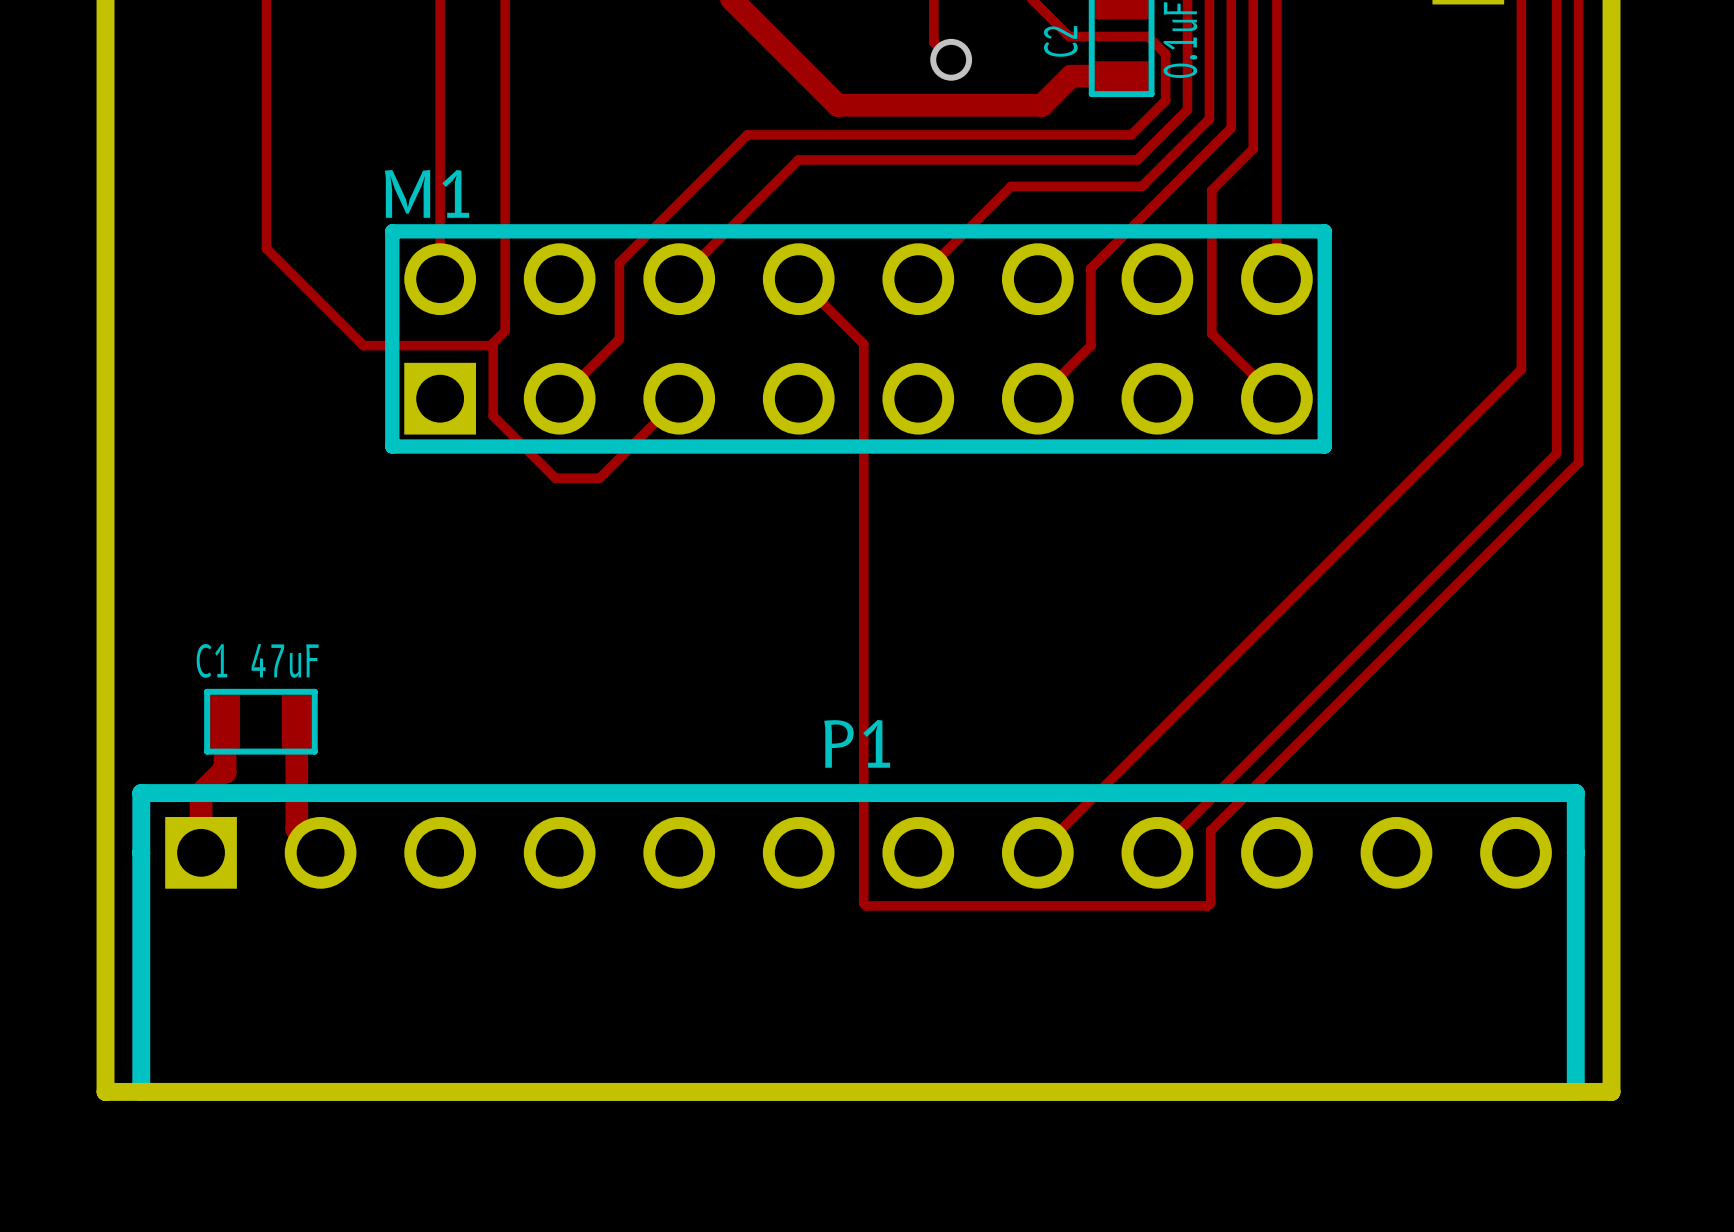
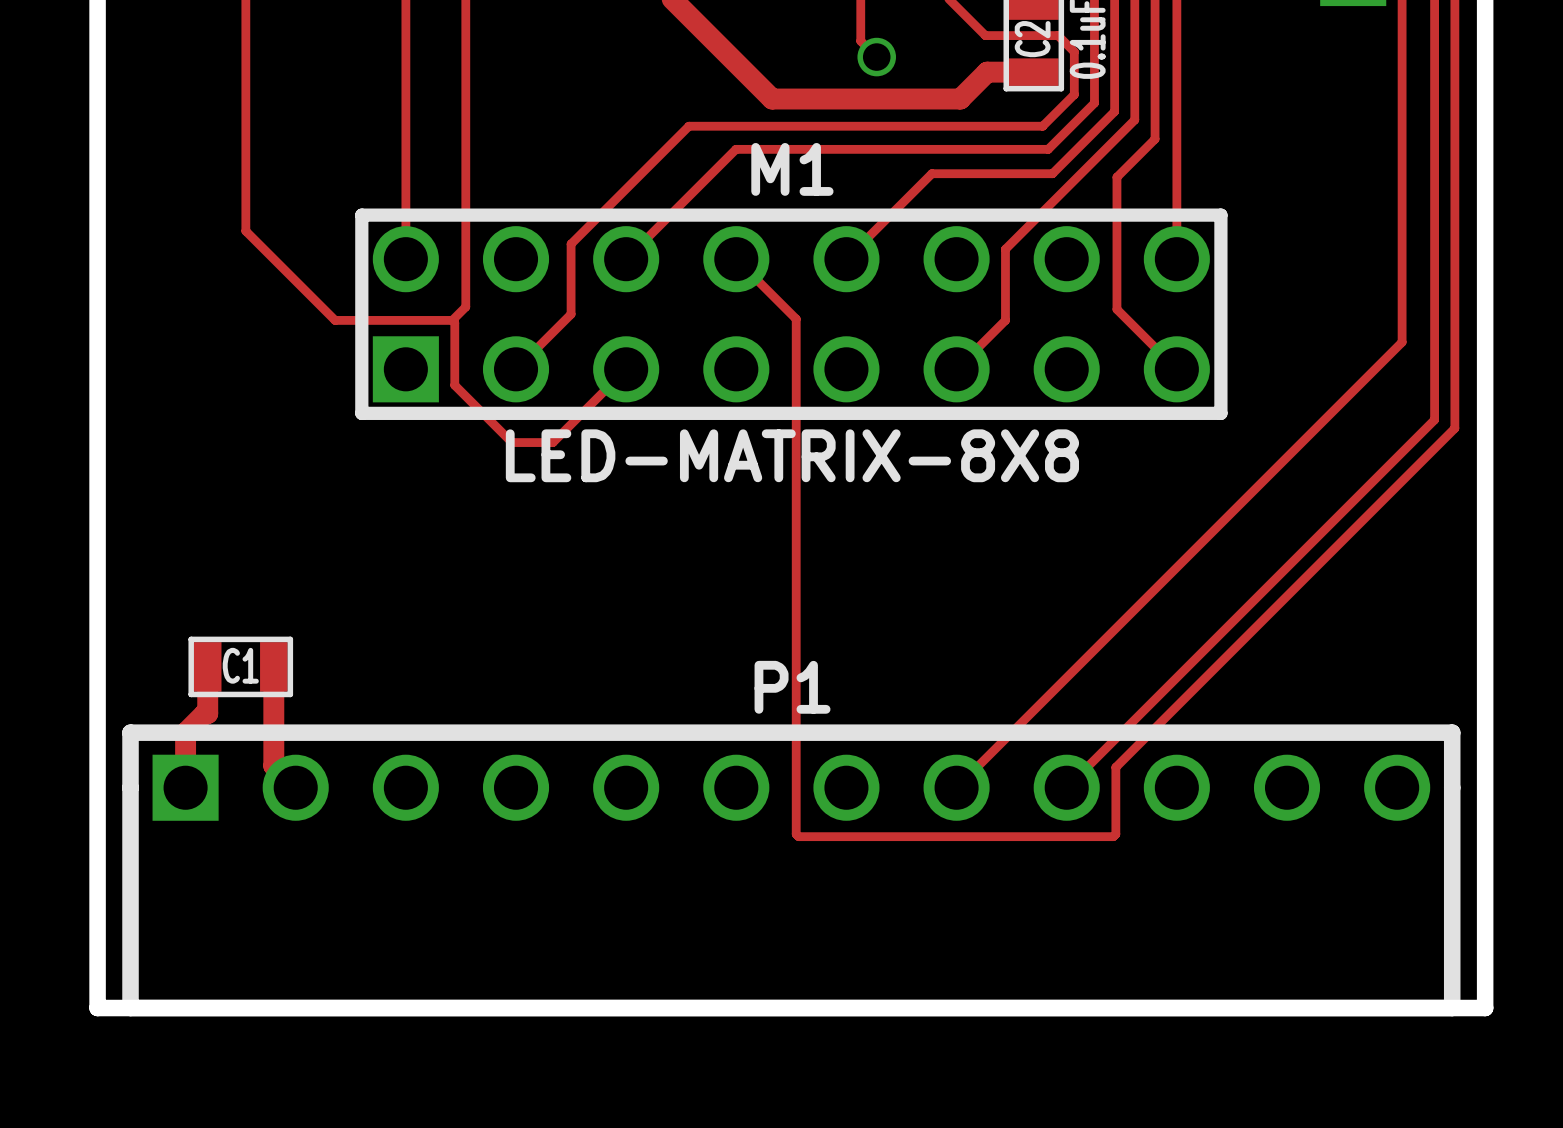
C2 name position: C2 (1060, 41) -> C2 (1032, 39)
M1 name position: M1 (427, 193) -> M1 (792, 169)
M1 value: none -> LED-MATRIX-8X8 (792, 455)
C1 name position: C1 (211, 660) -> C1 (240, 665)
C1 value: 47uF (285, 660) -> none

